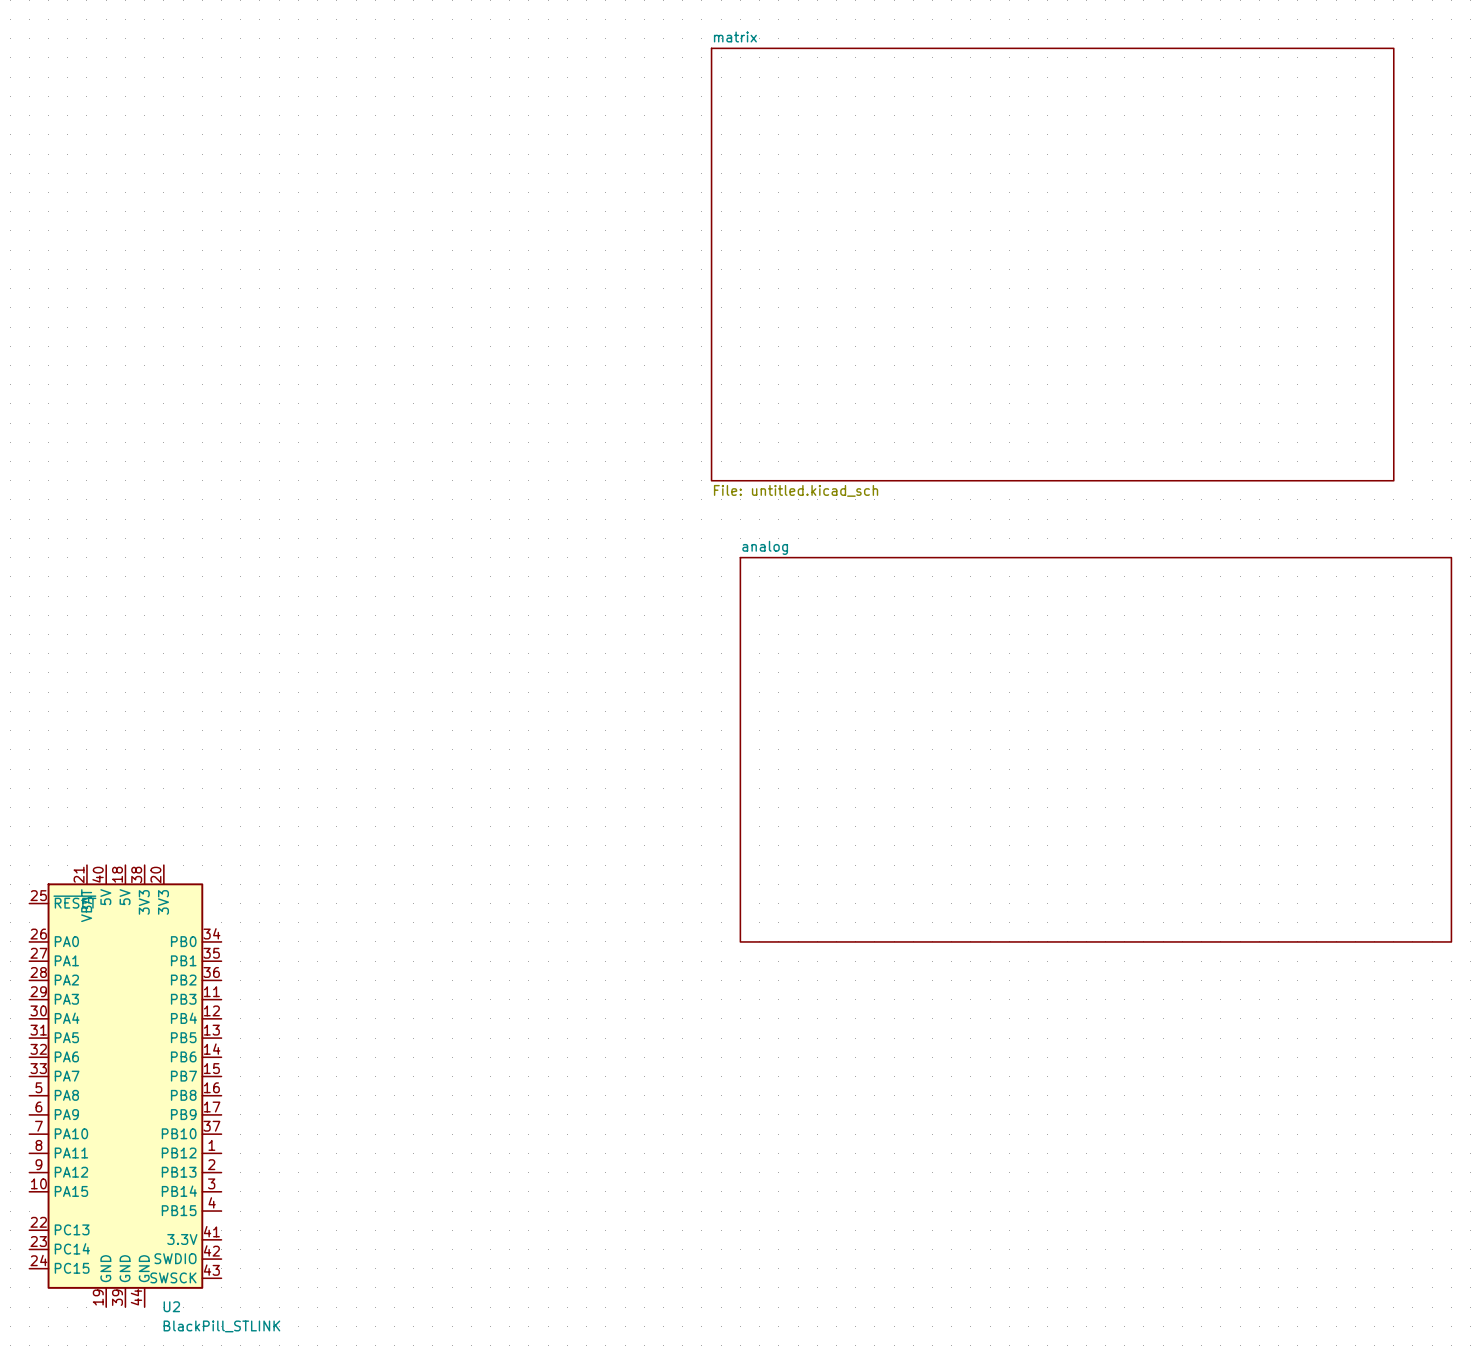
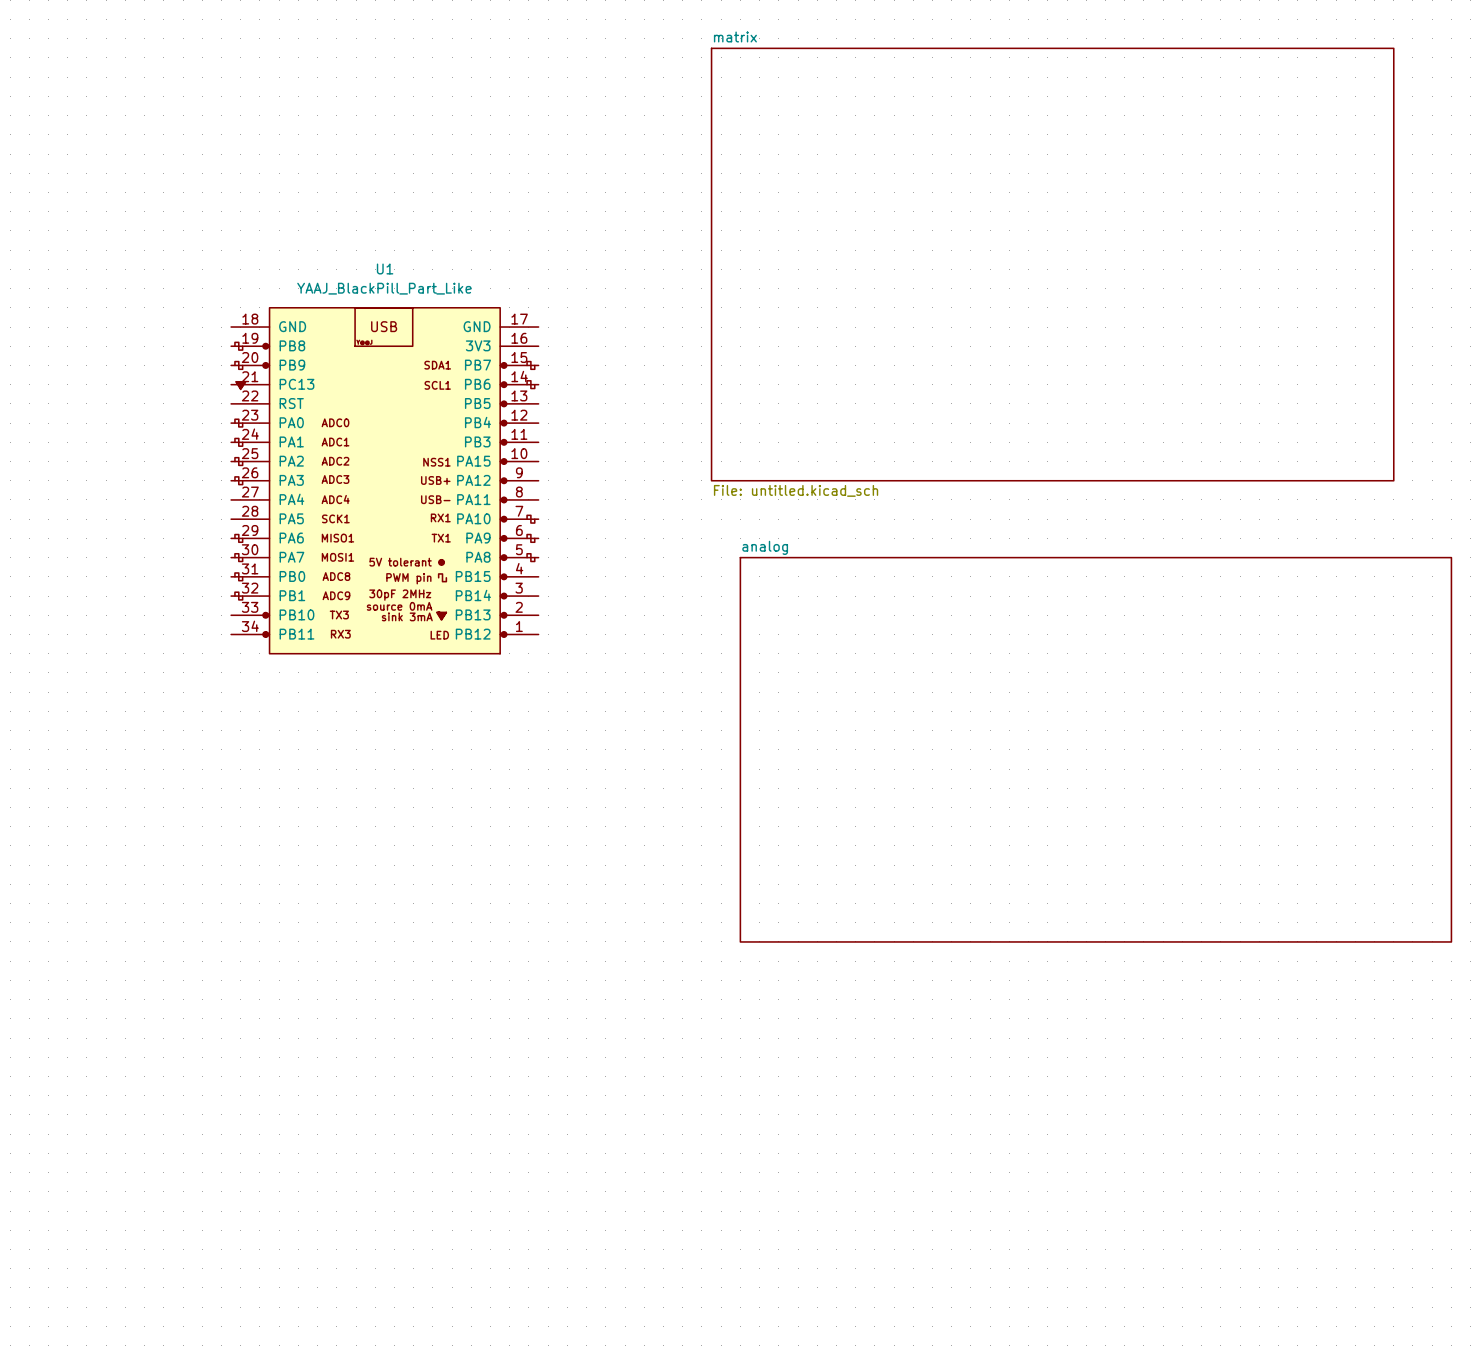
U1: none -> YAAJ_BlackPill_Part_Like (384, 480)
U2: BlackPill_STLINK (125, 1086) -> none

